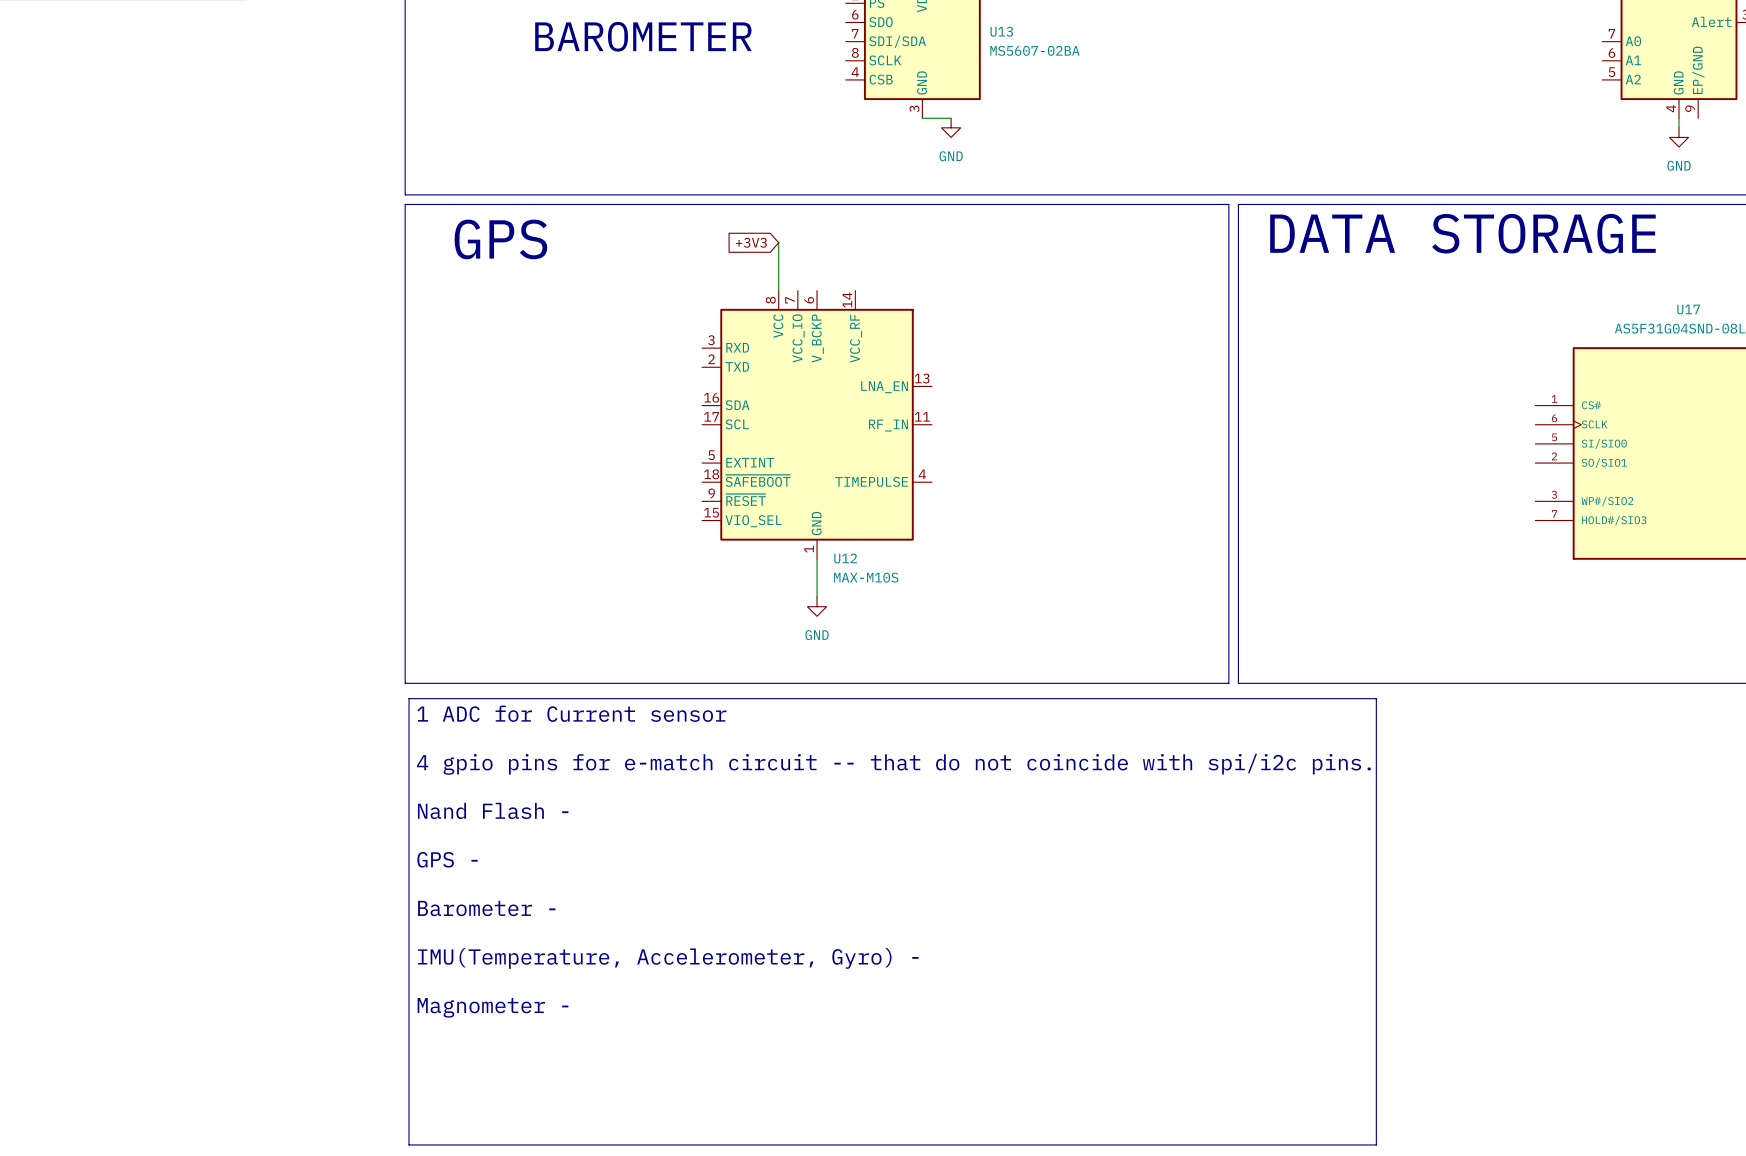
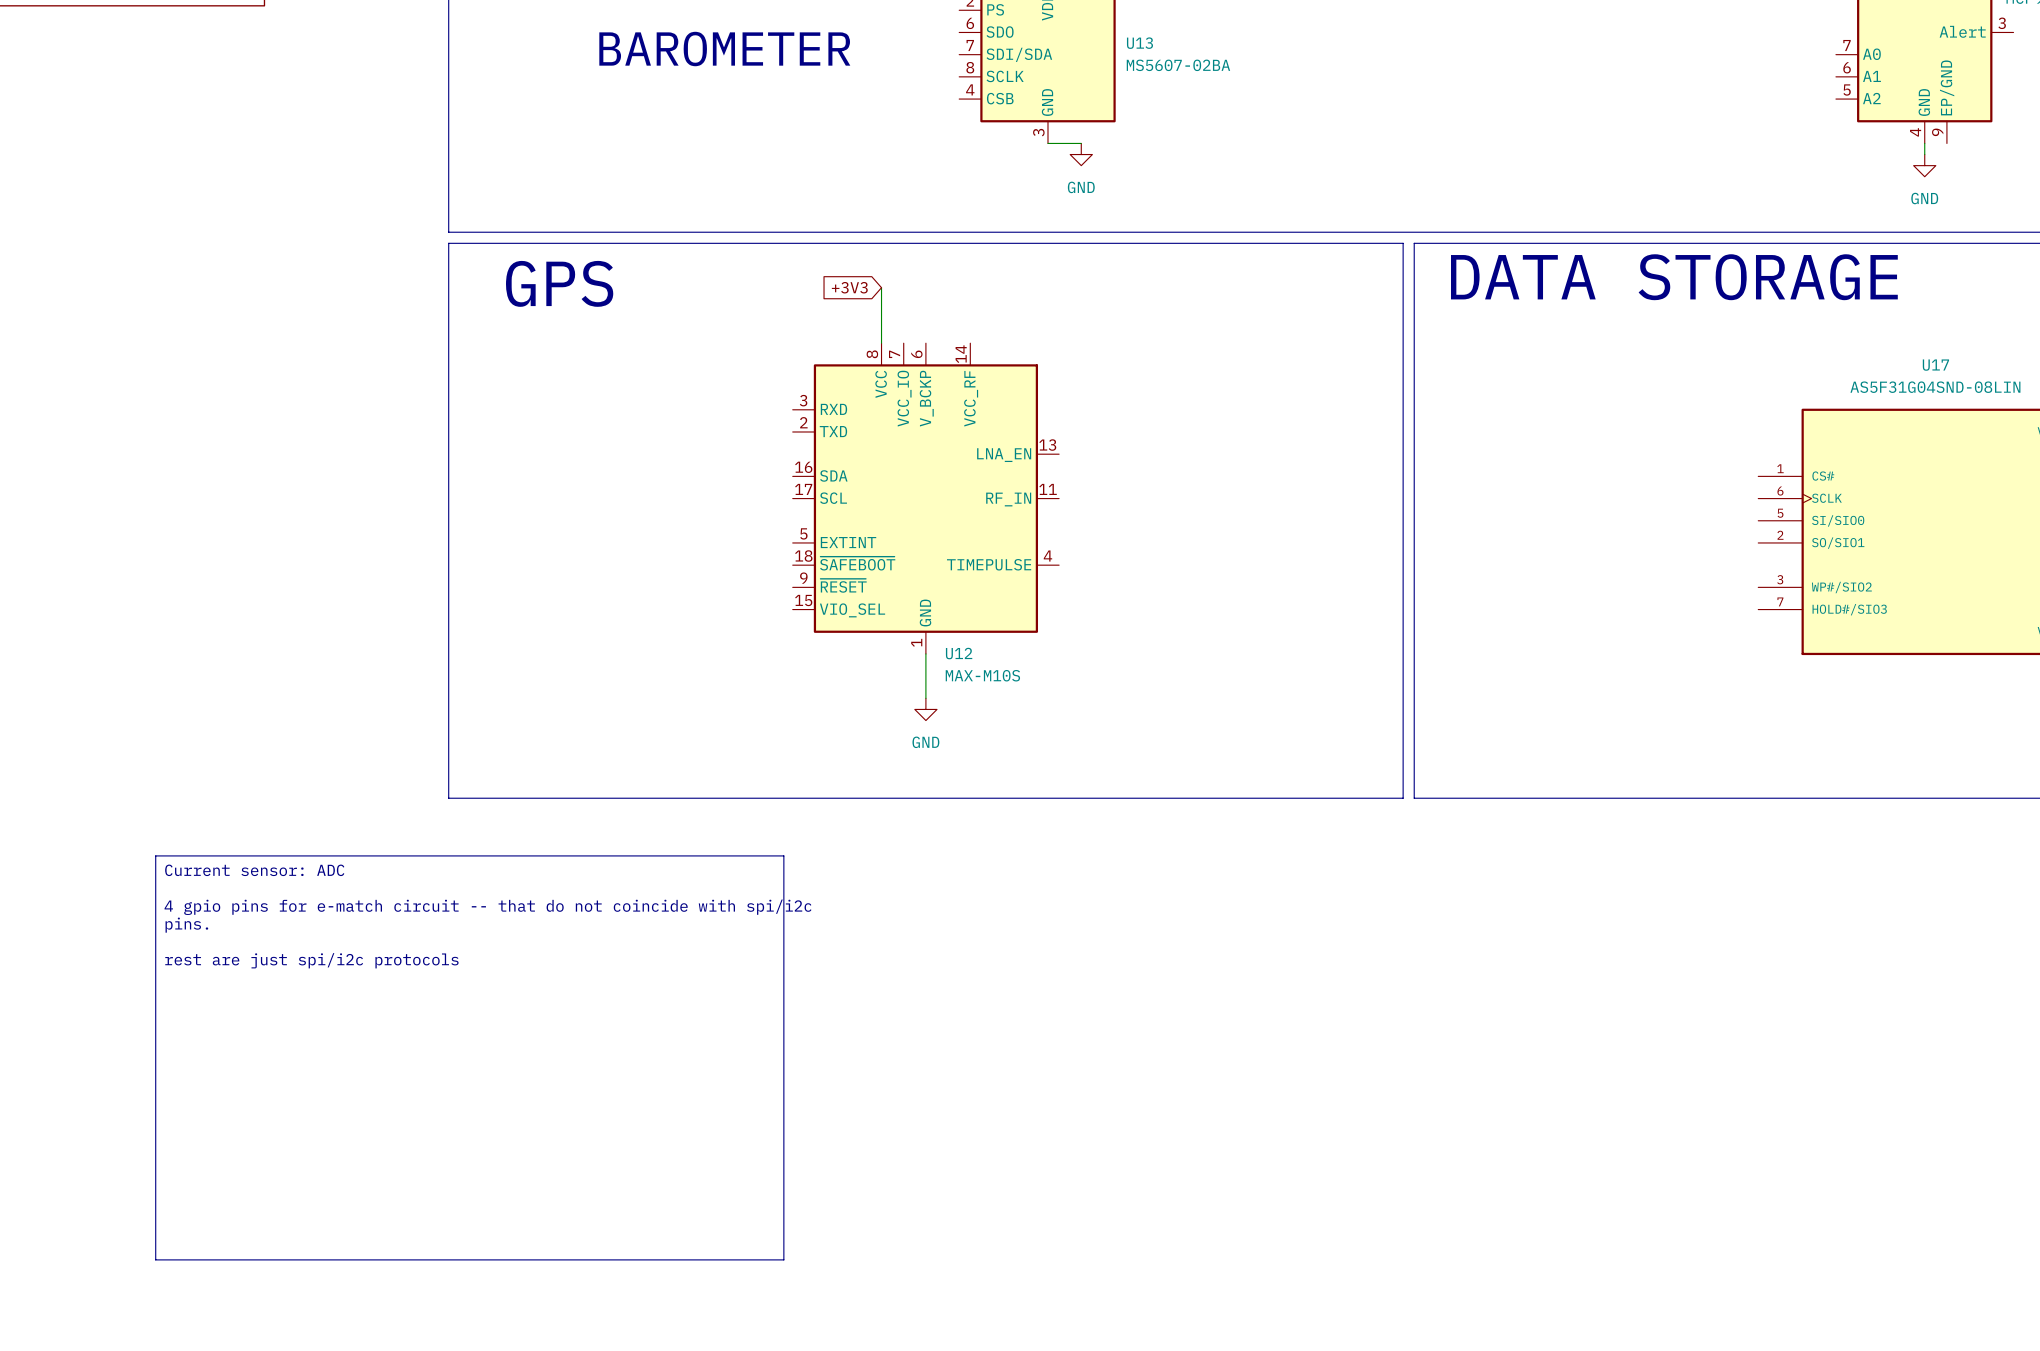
line: (409, 698) (1376, 698) (1376, 1144) (409, 1144) (409, 698) -> none
text: 1 ADC for Current sensor (571, 713) -> none
line: none -> (155, 855) (783, 855) (783, 1259) (155, 1259) (155, 855)
text: none -> Current sensor: ADC (254, 870)
text: 4 gpio pins for e-match circuit -- that do not coincide with spi/i2c pins. (893, 764) -> none
text: none -> 4 gpio pins for e-match circuit -- that do not coincide with spi/i2c (488, 907)
text: none -> pins. (186, 925)
text: Nand Flash - (493, 810) -> none
text: none -> rest are just spi/i2c protocols (311, 960)
text: GPS - (447, 859) -> none
text: Barometer - (486, 908) -> none
text: IMU(Temperature, Accelerometer, Gyro) - (668, 958) -> none
text: Magnometer - (493, 1007) -> none

